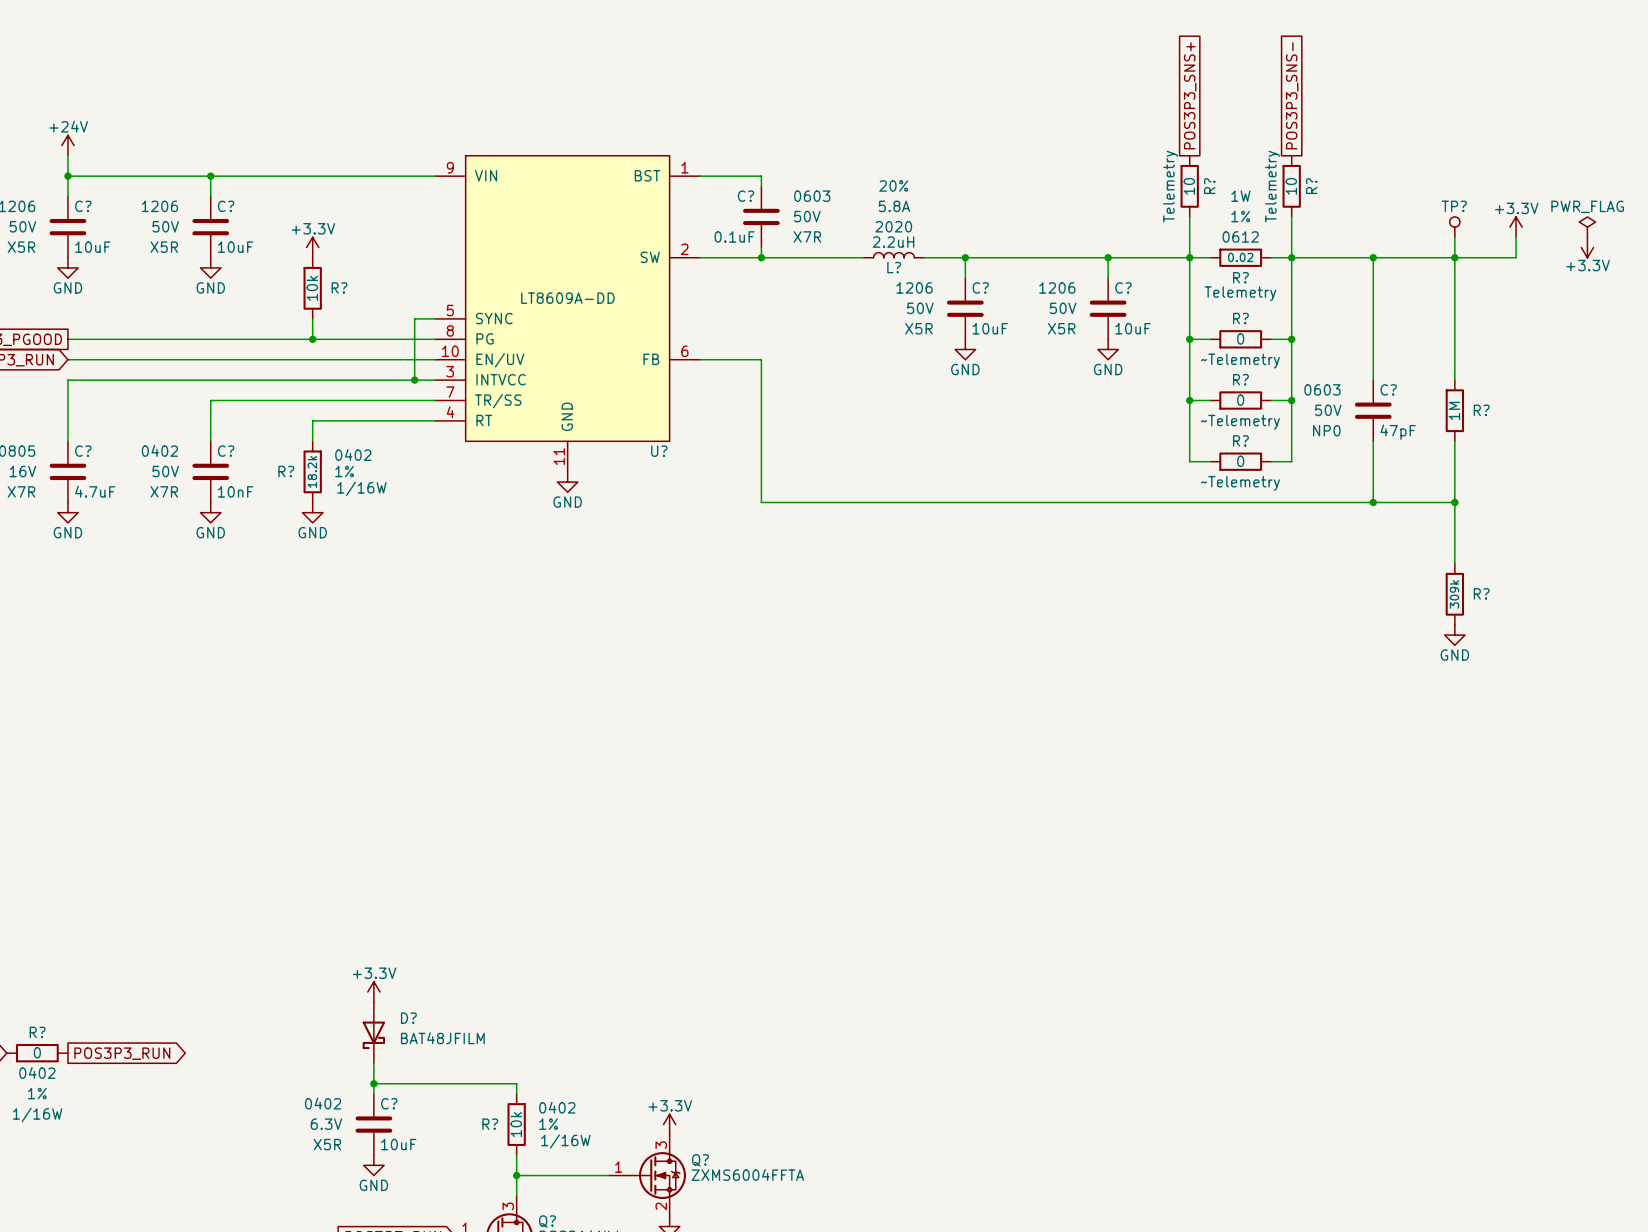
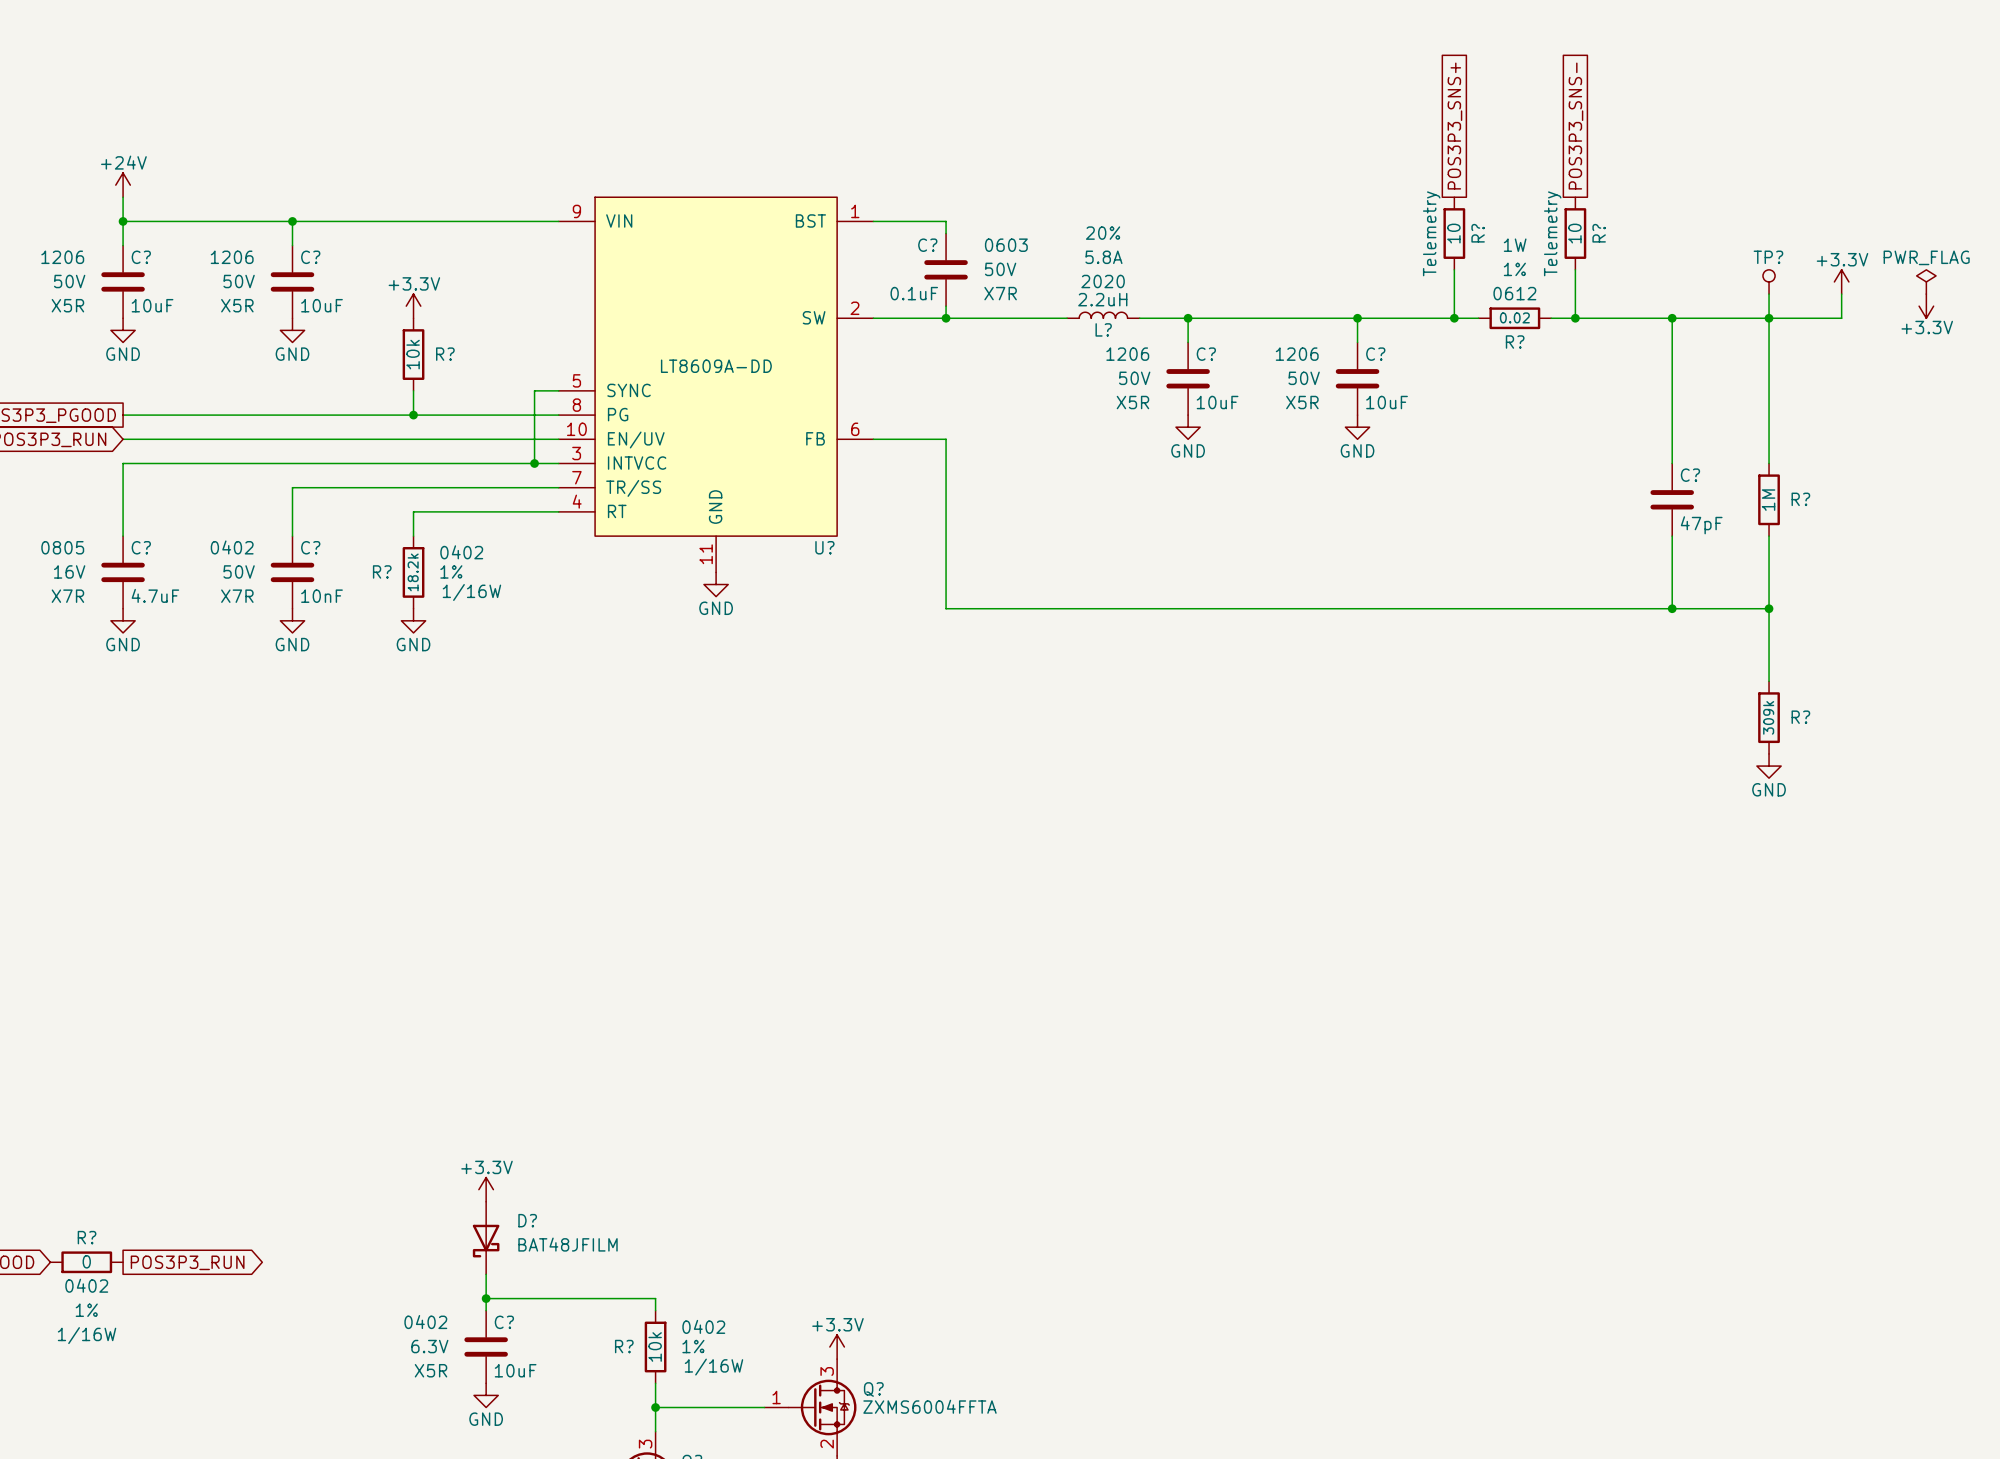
wire: (1189, 257) (1189, 461) (1210, 461) -> none
wire: (1291, 257) (1291, 461) (1271, 461) -> none
R? text: Telemetry (1240, 293) -> none
wire: (1189, 339) (1210, 339) -> none
junction: (1189, 339) -> none
R?: 0 (1240, 339) -> none
wire: (1271, 339) (1291, 339) -> none
junction: (1291, 339) -> none
C? text: 0603 (1322, 389) -> none
wire: (1189, 400) (1210, 400) -> none
junction: (1189, 400) -> none
R?: 0 (1240, 400) -> none
wire: (1271, 400) (1291, 400) -> none
junction: (1291, 400) -> none
C? text: 50V (1328, 410) -> none
C? text: NP0 (1326, 430) -> none
R?: 0 (1240, 461) -> none

